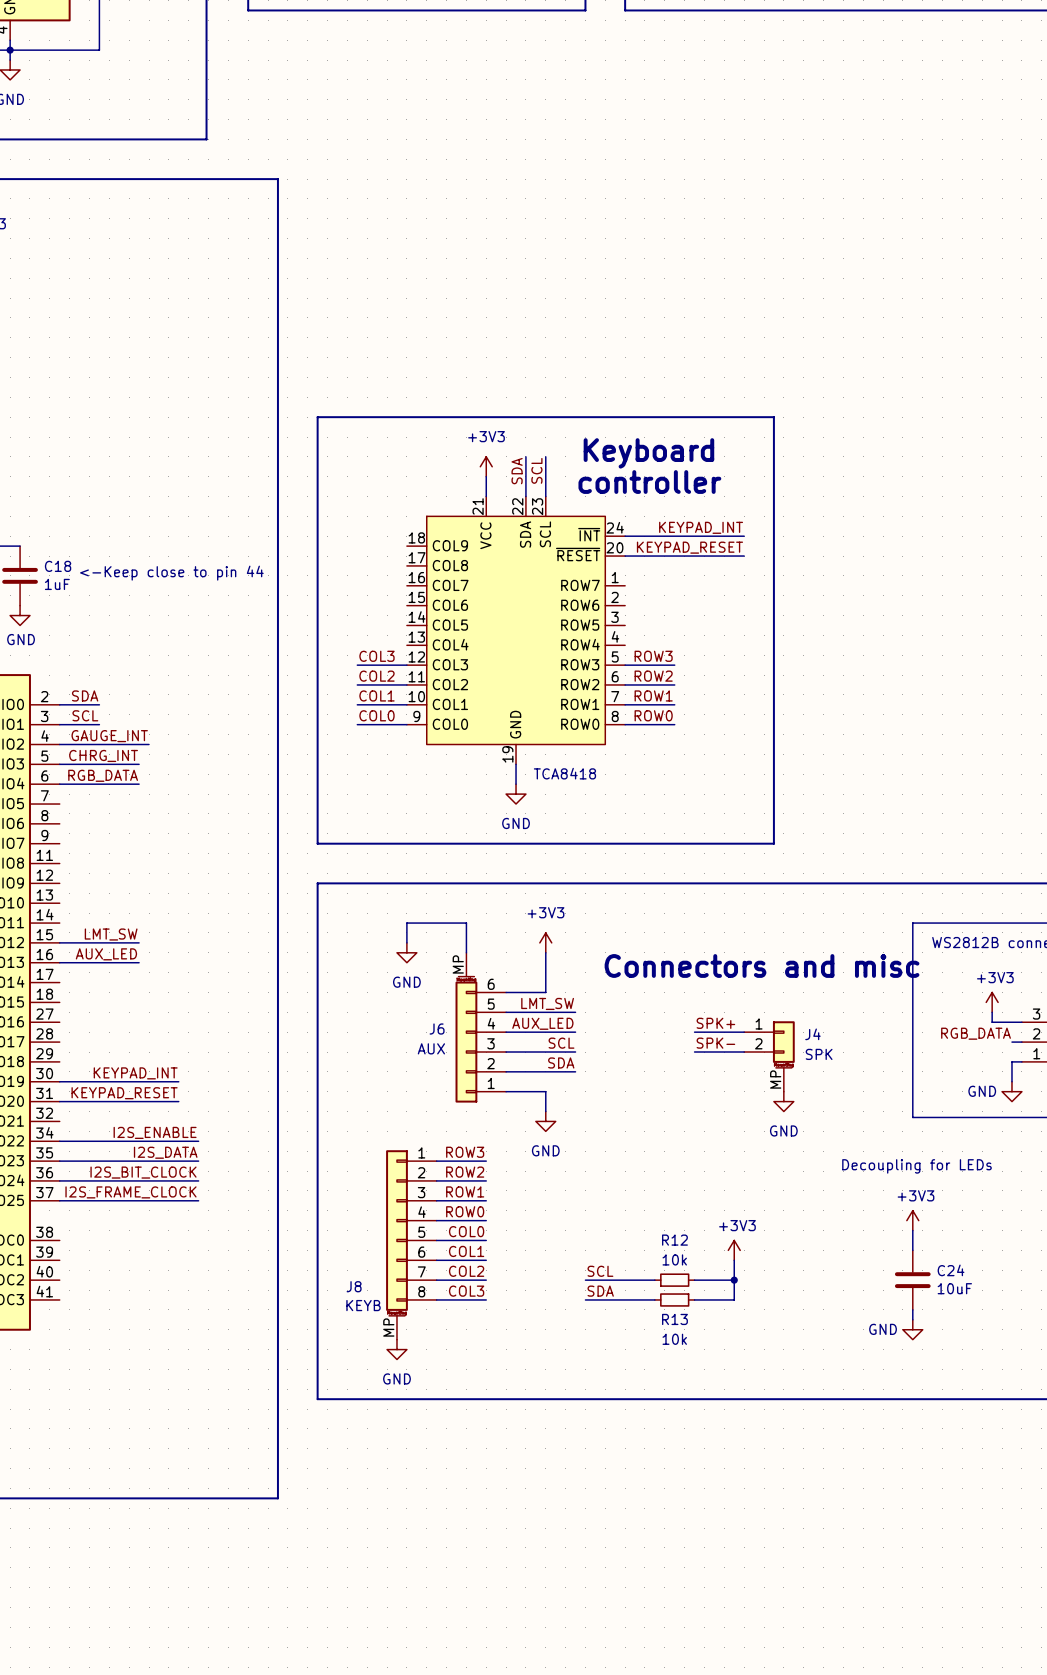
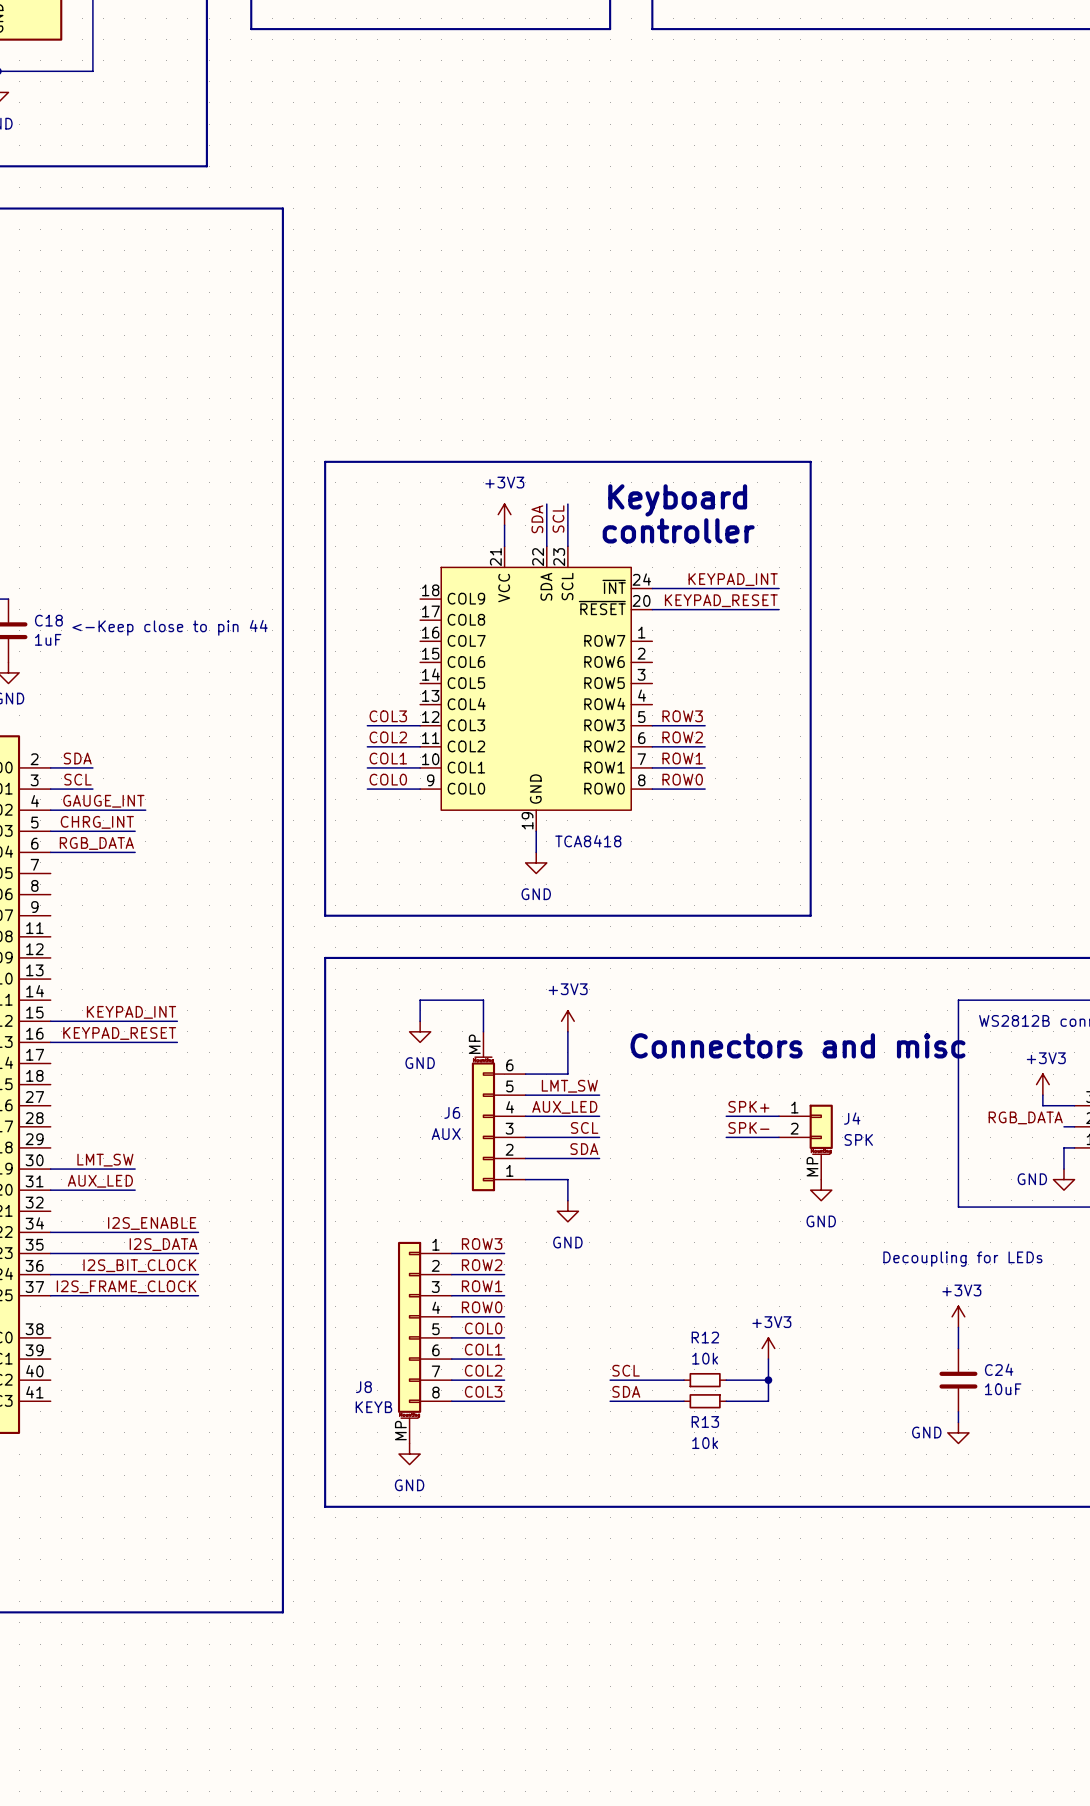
label position: LMT_SW (111, 934) -> LMT_SW (105, 1160)
label position: AUX_LED (106, 954) -> AUX_LED (100, 1181)
label position: KEYPAD_INT (135, 1073) -> KEYPAD_INT (131, 1012)
wire: (139, 1081) (178, 1081) -> (135, 1042) (177, 1042)
label position: KEYPAD_RESET (124, 1093) -> KEYPAD_RESET (119, 1033)
wire: (139, 1101) (178, 1101) -> (135, 1021) (177, 1021)

